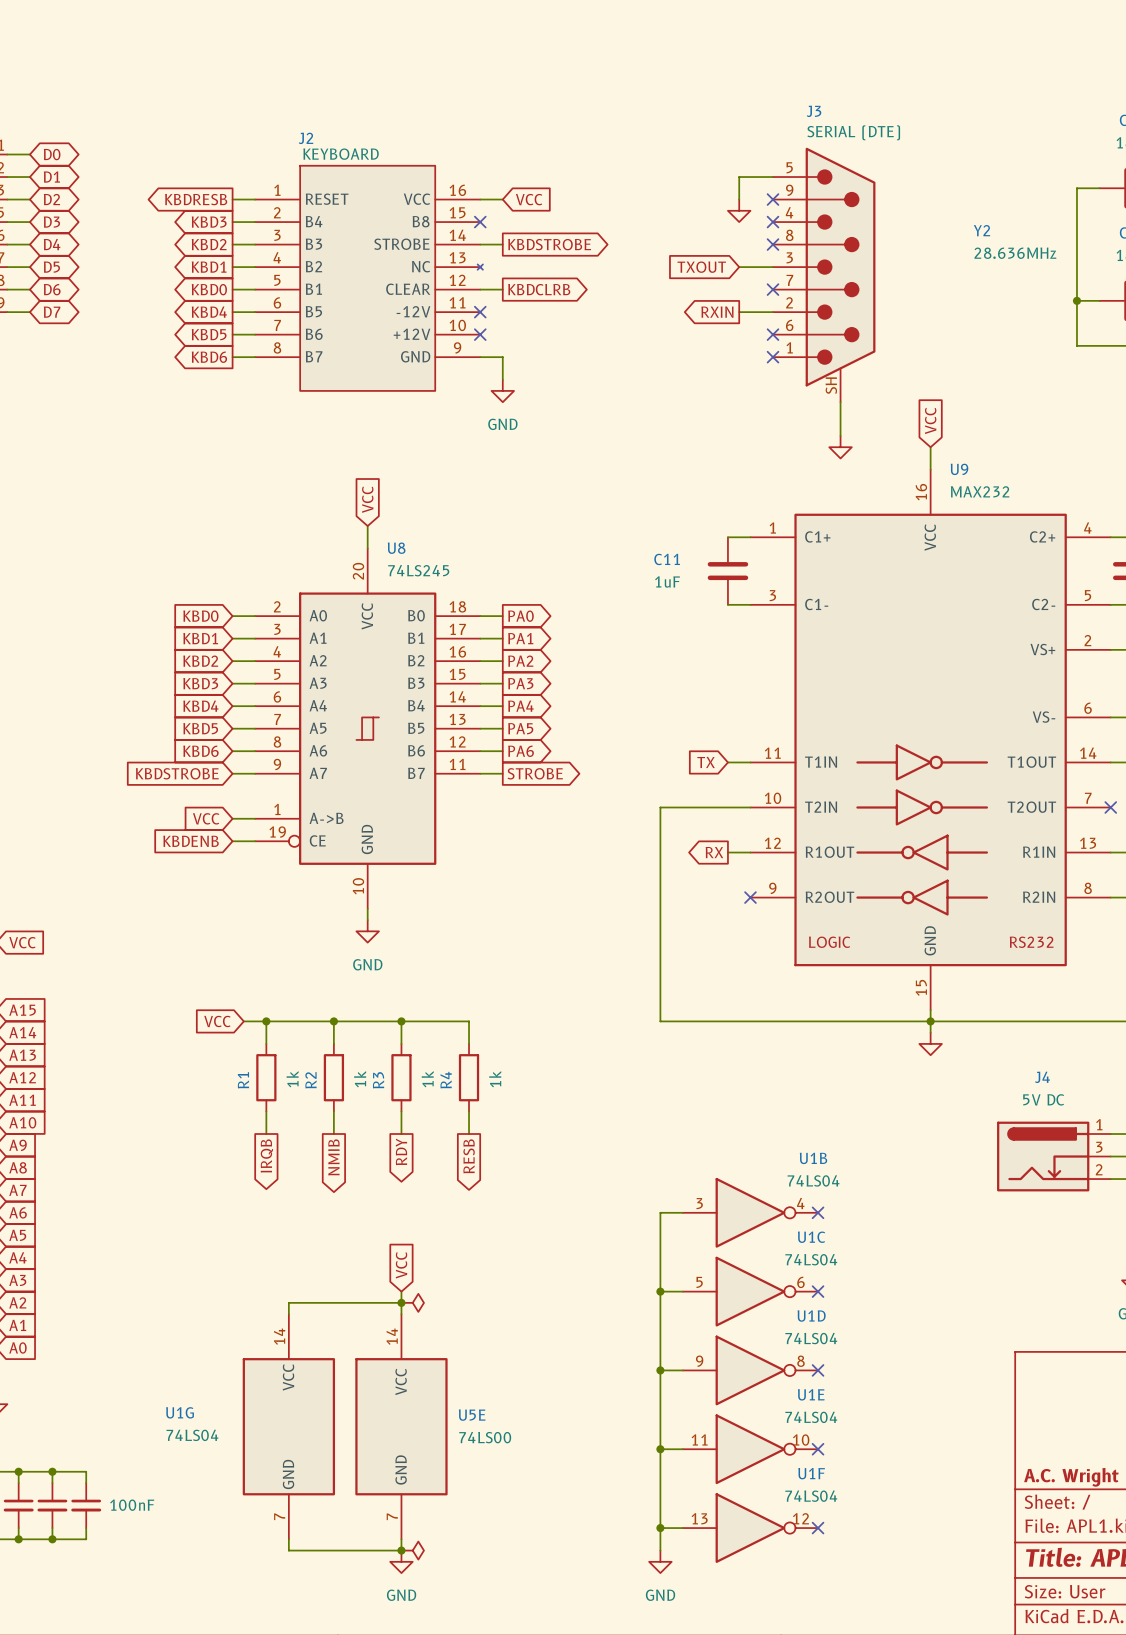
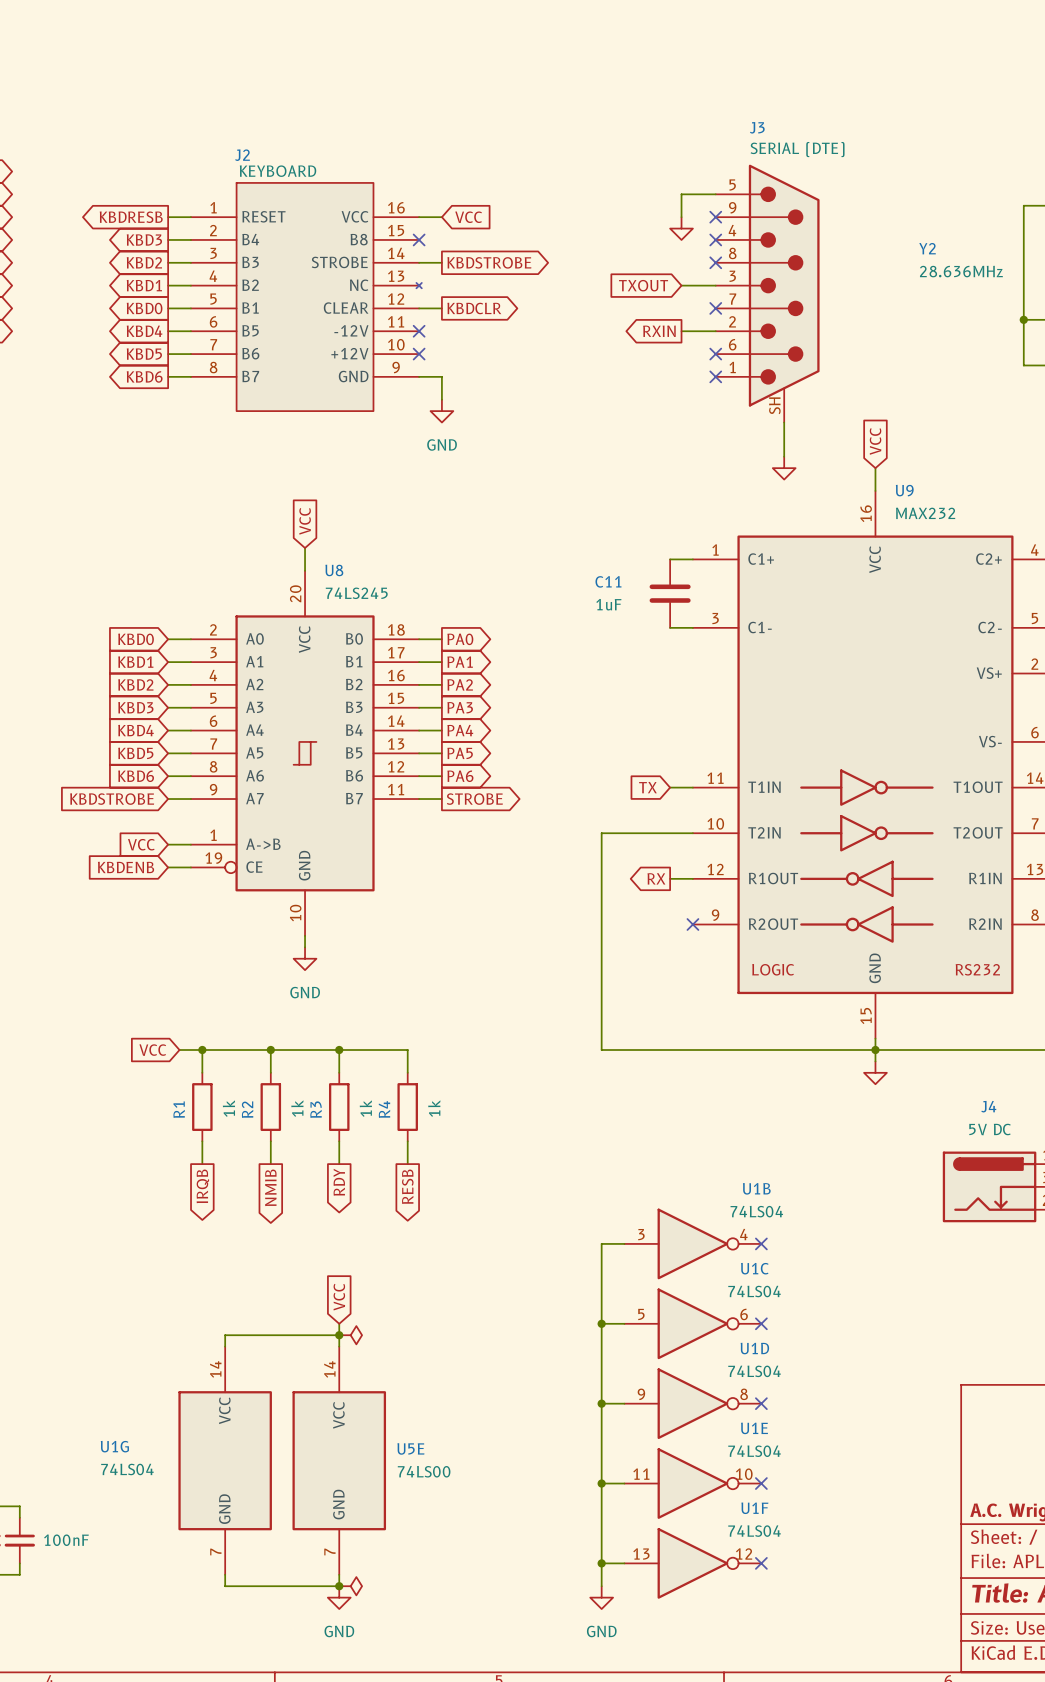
global label: KBDCLRB (539, 289) -> KBDCLR (474, 308)

